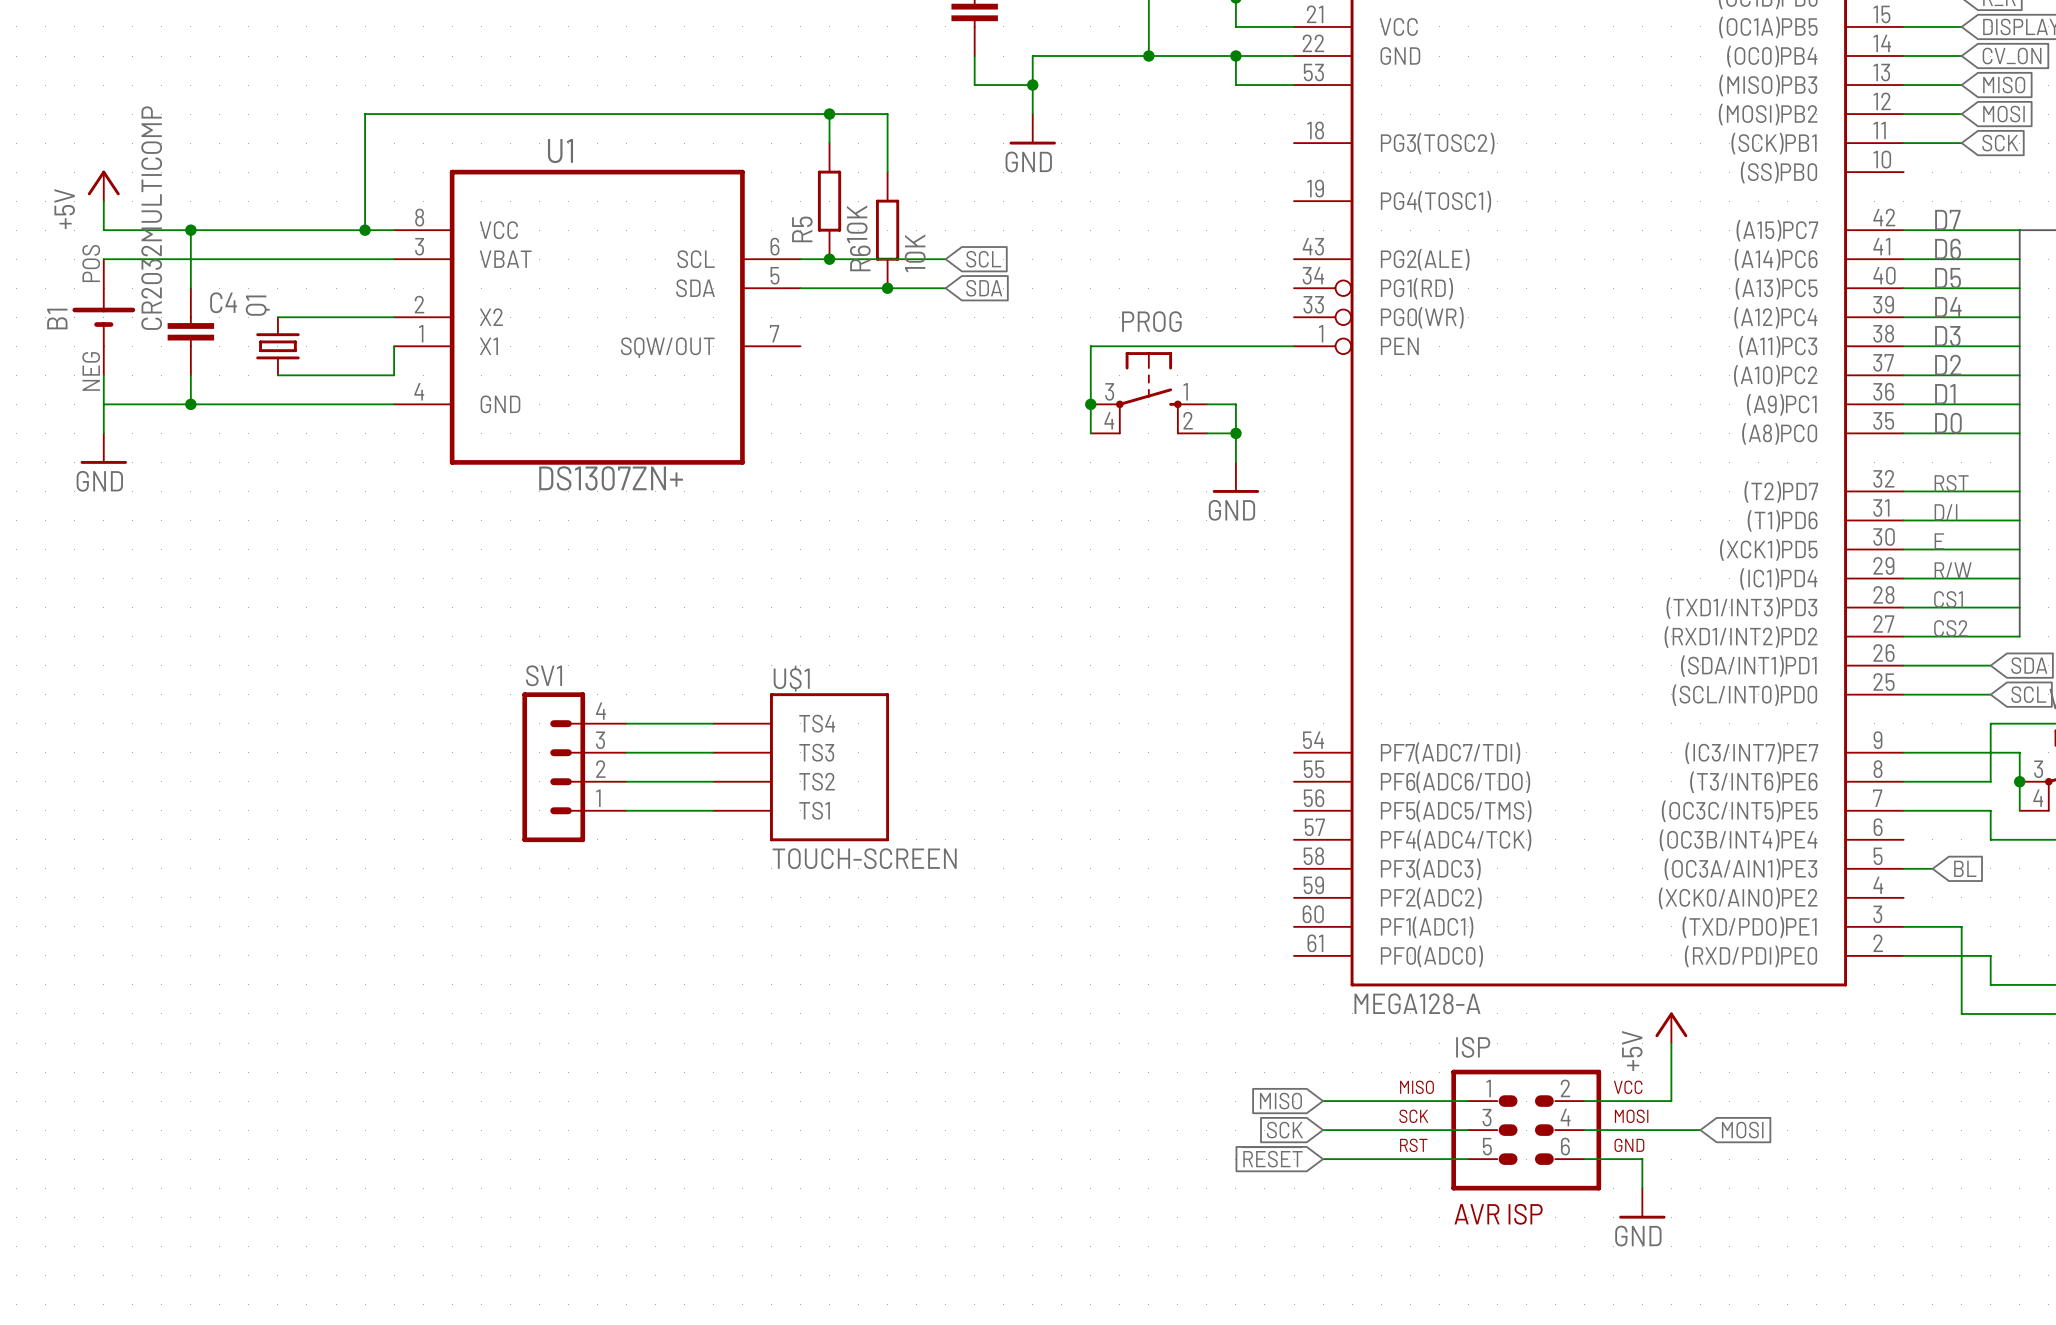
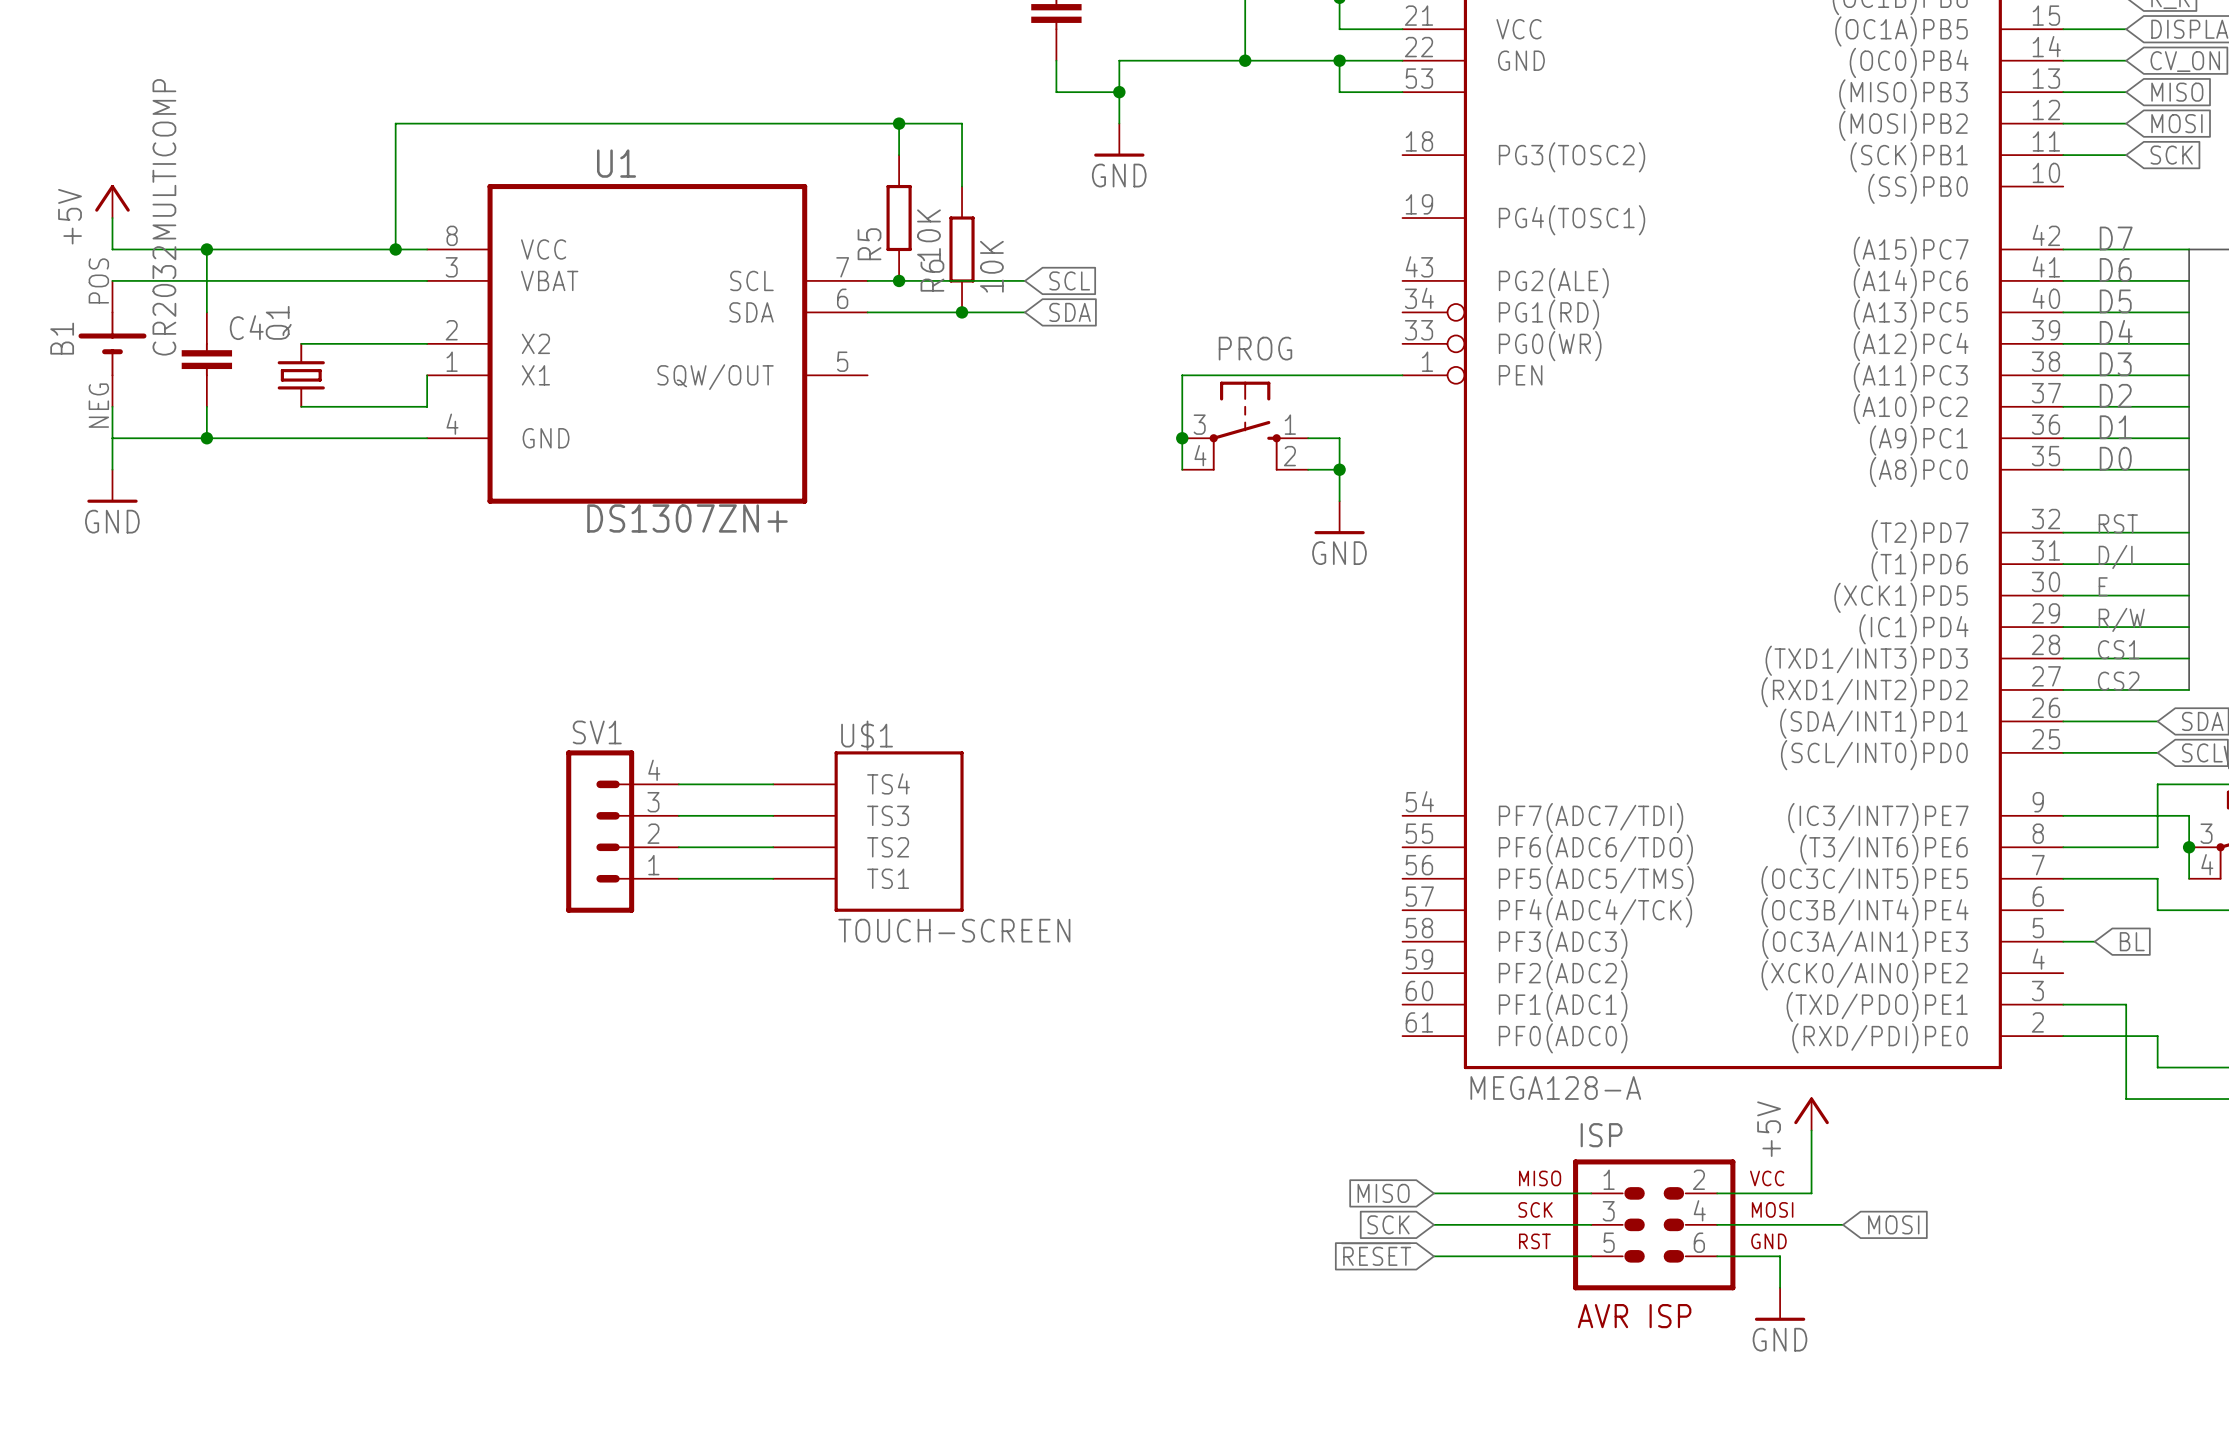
U1 pin number: 6 (775, 246) -> 7 (842, 267)
U1 pin number: 5 (775, 275) -> 6 (842, 298)
U1 pin number: 7 (774, 333) -> 5 (842, 361)

